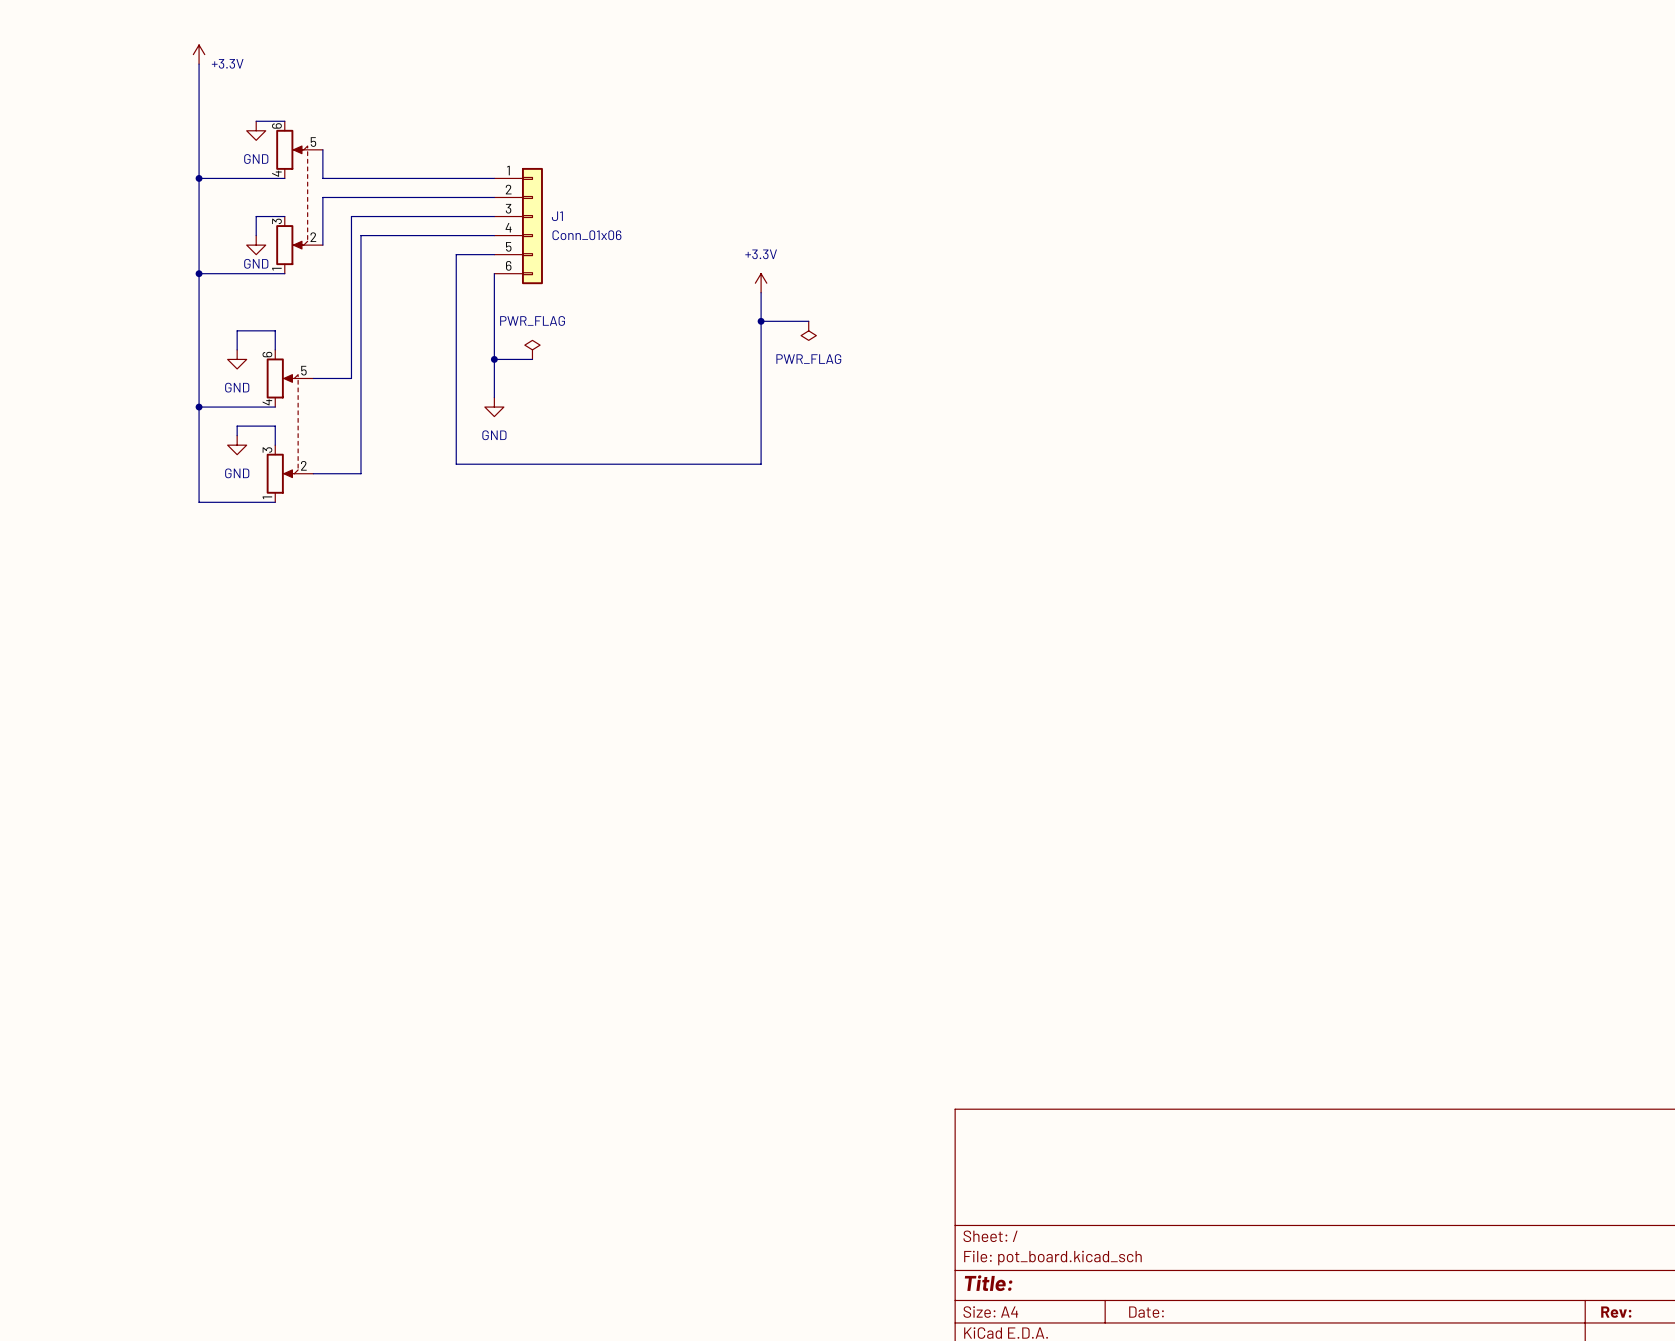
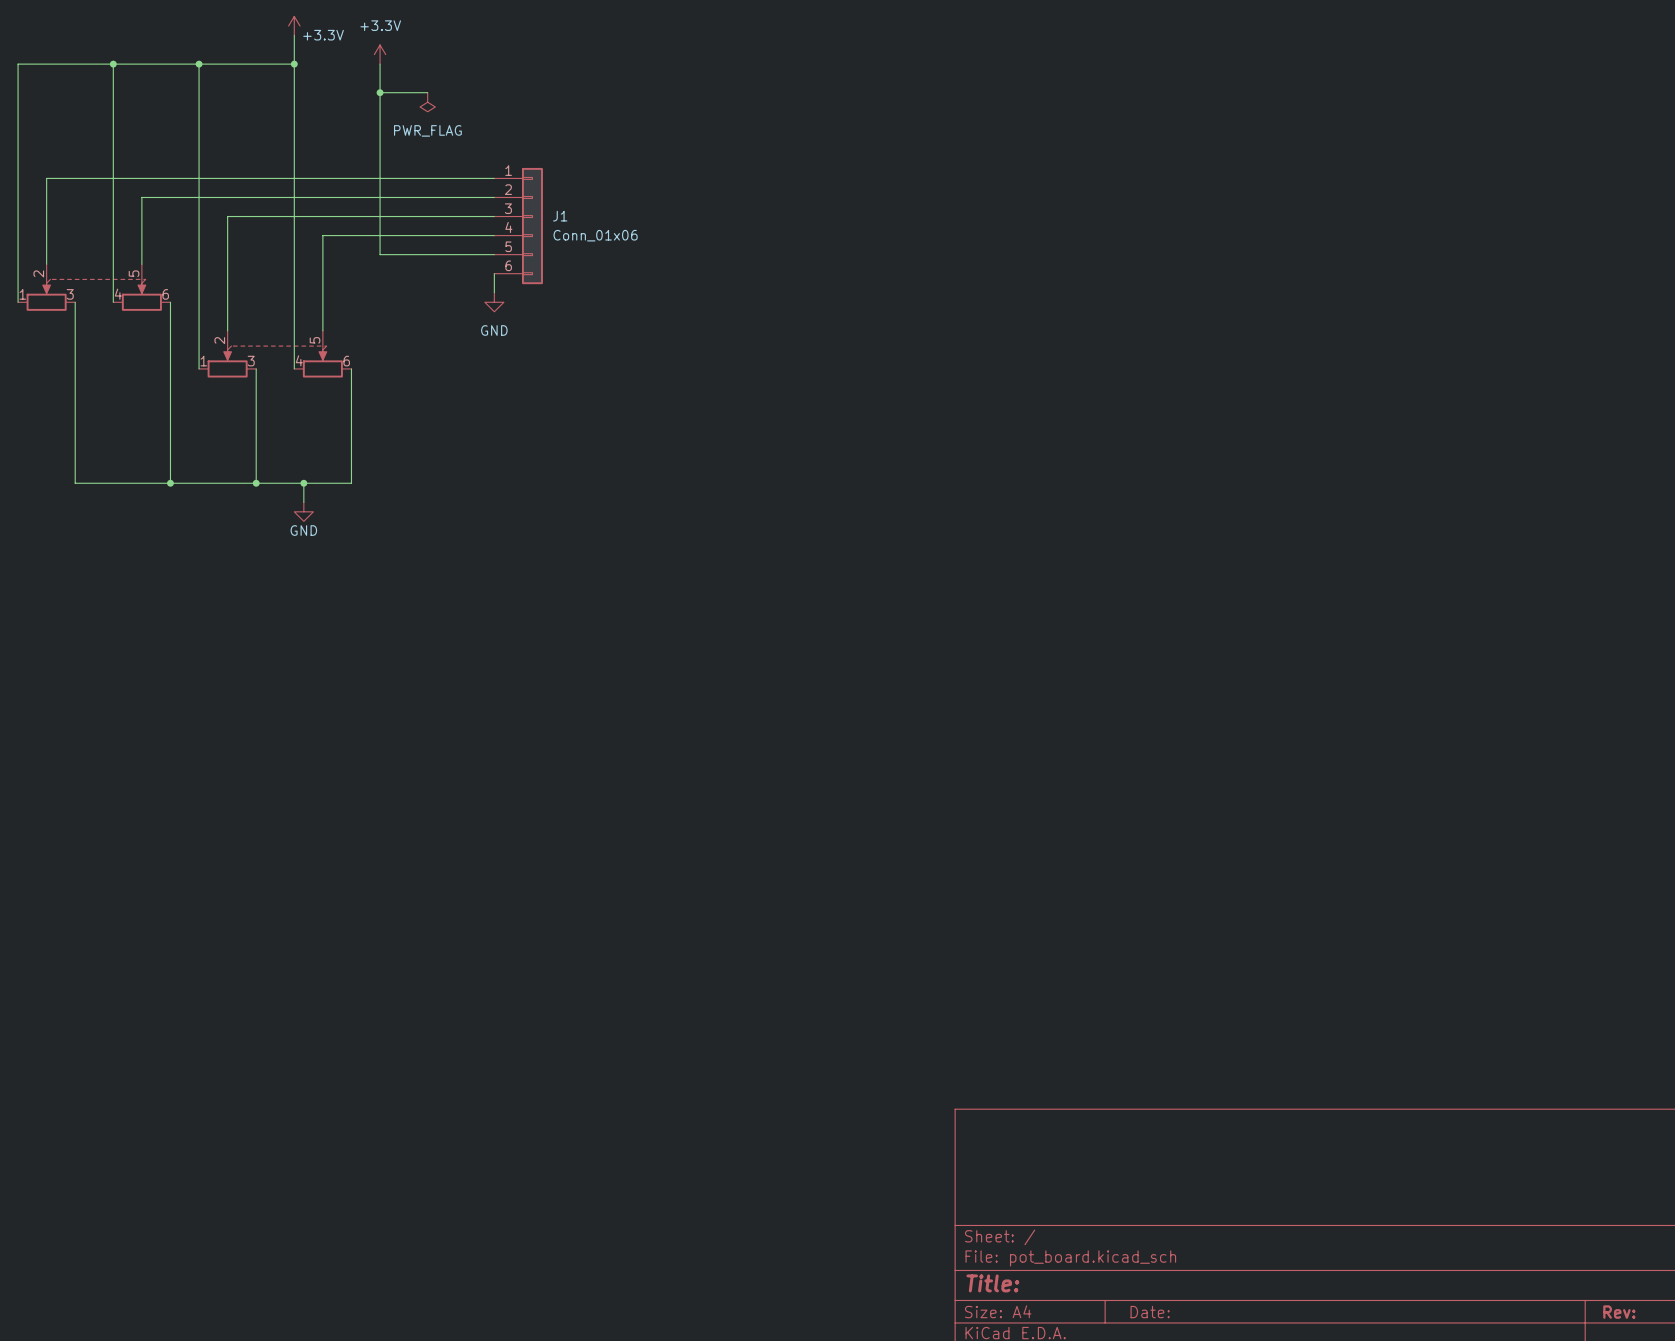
power symbol: none -> +3.3V (294, 26)
wire: none -> (294, 35) (294, 368)
power symbol: +3.3V (199, 54) -> none
power symbol: none -> +3.3V (380, 54)
wire: none -> (113, 64) (113, 302)
junction: none -> (113, 64)
junction: none -> (199, 64)
wire: none -> (294, 64) (18, 64) (18, 302)
junction: none -> (294, 64)
wire: none -> (380, 92) (427, 92)
junction: none -> (380, 92)
power symbol: none -> PWR_FLAG (427, 102)
wire: (256, 121) (284, 121) -> none
power symbol: GND (256, 130) -> none
wire: (322, 149) (322, 178) -> (284, 178) (322, 178)
wire: none -> (199, 178) (46, 178) (46, 264)
junction: (199, 178) -> none
part: (299, 197) -> none
wire: (322, 197) (322, 235) -> (360, 235) (322, 235)
wire: none -> (322, 197) (141, 197) (141, 264)
wire: (256, 216) (256, 235) -> (256, 216) (227, 216) (227, 330)
wire: (351, 216) (351, 368) -> (351, 216) (284, 216)
wire: (360, 235) (360, 473) (313, 473) -> none
power symbol: GND (256, 245) -> none
wire: none -> (322, 245) (322, 330)
wire: (456, 254) (456, 464) (761, 464) (761, 292) -> (456, 254) (380, 254) (380, 64)
wire: (199, 273) (284, 273) -> none
junction: (199, 273) -> none
power symbol: +3.3V (761, 283) -> none
part: none -> (94, 287)
wire: (494, 292) (494, 397) -> none
wire: none -> (170, 302) (170, 483)
wire: (761, 321) (808, 321) -> none
junction: (761, 321) -> none
power symbol: PWR_FLAG (808, 330) -> none
wire: (237, 349) (237, 330) (275, 330) (275, 349) -> none
power symbol: PWR_FLAG (532, 349) -> none
part: none -> (275, 354)
power symbol: GND (237, 359) -> none
wire: (494, 359) (532, 359) -> none
junction: (494, 359) -> none
wire: (199, 368) (199, 502) (275, 502) -> none
wire: none -> (256, 368) (256, 483)
wire: (313, 378) (351, 378) -> (75, 302) (75, 483) (351, 483) (351, 378)
wire: (199, 407) (275, 407) -> none
junction: (199, 407) -> none
power symbol position: GND (494, 407) -> GND (494, 302)
part: (290, 426) -> none
wire: (237, 435) (237, 426) (275, 426) (275, 445) -> none
power symbol: GND (237, 445) -> none
junction: none -> (170, 483)
junction: none -> (256, 483)
wire: none -> (303, 483) (303, 502)
junction: none -> (303, 483)
power symbol: none -> GND (303, 511)

